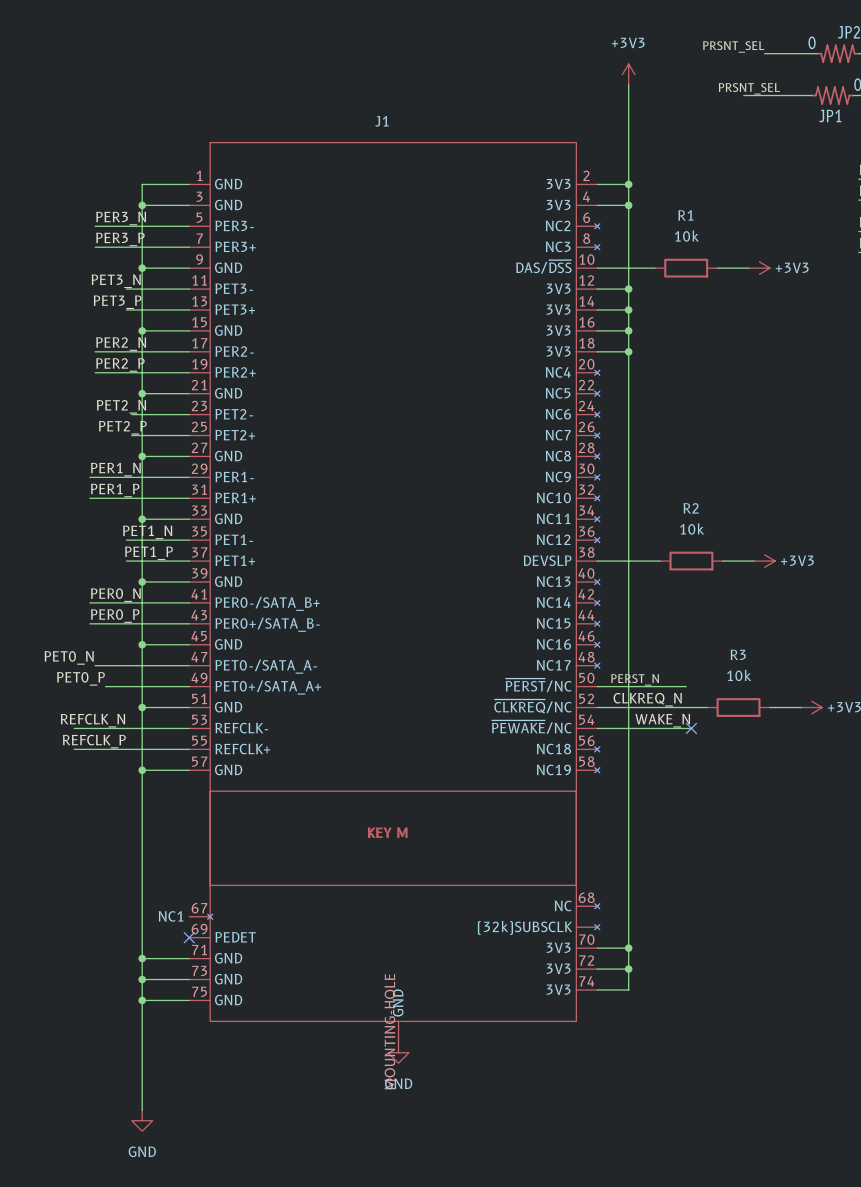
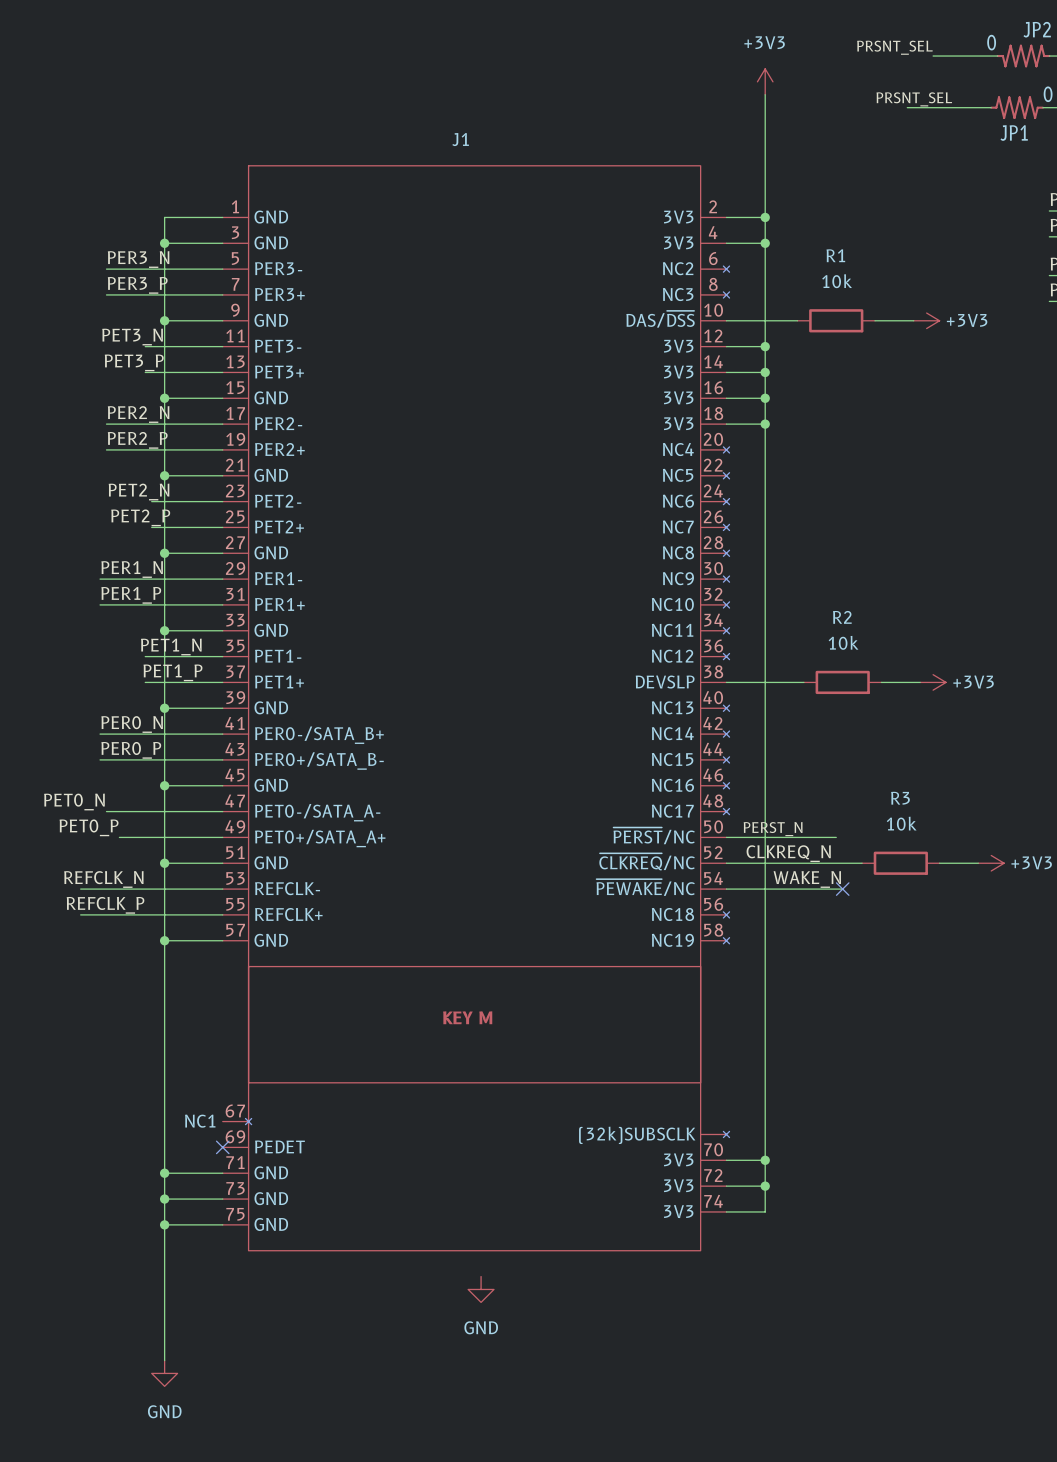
J1 symbol: [189, 142, 600, 1043] -> [222, 165, 730, 1251]

